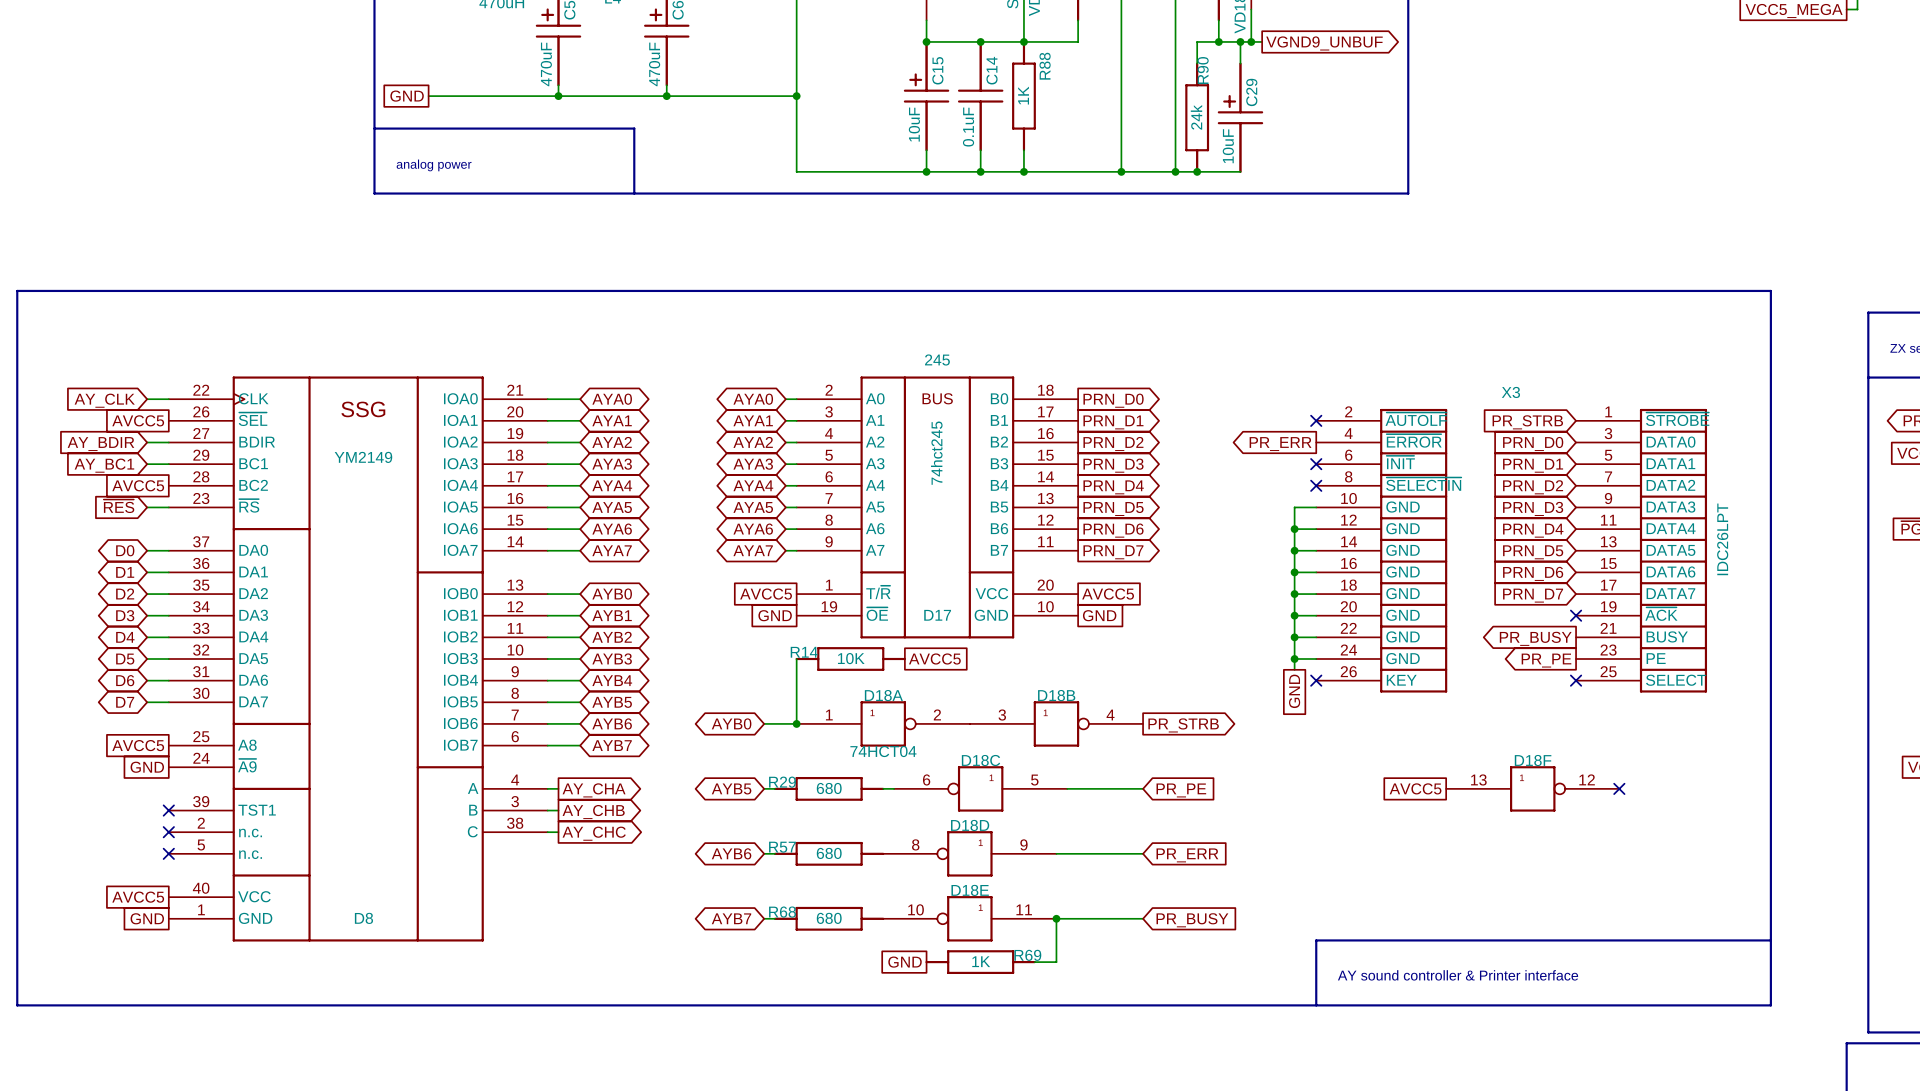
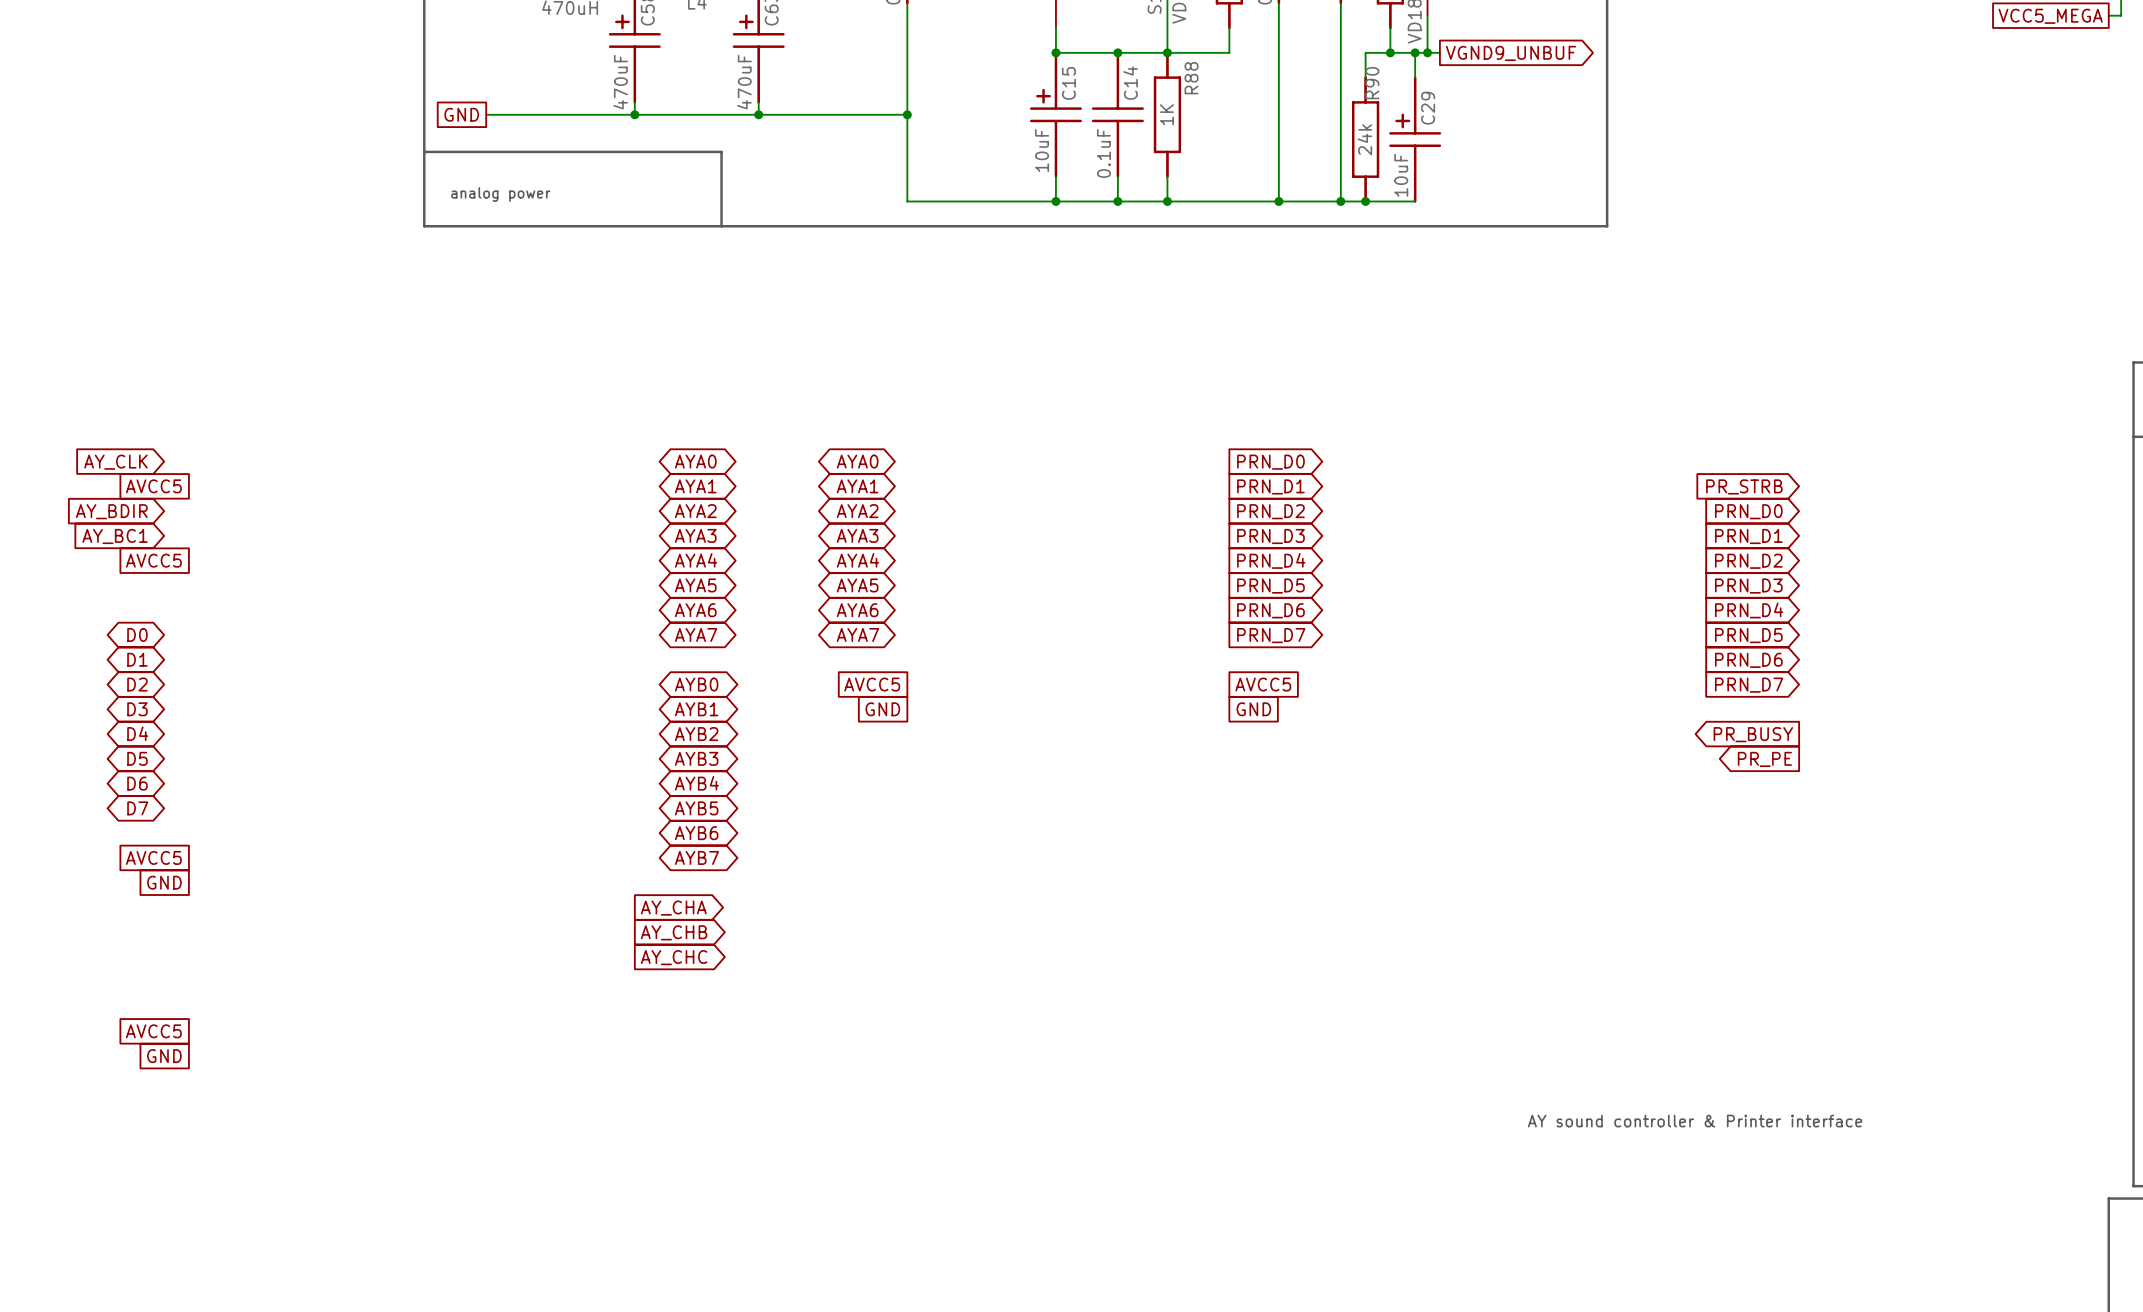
line: (17, 290) (1770, 290) (1770, 1005) (17, 1005) (17, 290) -> none
wire: (147, 399) (168, 399) -> none
wire: (547, 399) (580, 399) -> none
wire: (785, 399) (796, 399) -> none
wire: (547, 420) (580, 420) -> none
wire: (785, 420) (796, 420) -> none
no-connect mark: (1316, 420) -> none
wire: (147, 442) (168, 442) -> none
wire: (547, 442) (580, 442) -> none
wire: (785, 442) (796, 442) -> none
global label: PR_ERR (1280, 444) -> none
wire: (147, 464) (168, 464) -> none
wire: (547, 464) (580, 464) -> none
wire: (785, 464) (796, 464) -> none
no-connect mark: (1316, 464) -> none
wire: (547, 485) (580, 485) -> none
wire: (785, 485) (796, 485) -> none
no-connect mark: (1316, 485) -> none
global label: ~{RES} (118, 506) -> none
wire: (147, 507) (168, 507) -> none
wire: (547, 507) (580, 507) -> none
wire: (785, 507) (796, 507) -> none
D17: 245 (937, 507) -> none
wire: (1316, 507) (1294, 507) (1294, 669) -> none
wire: (547, 529) (580, 529) -> none
wire: (785, 529) (796, 529) -> none
wire: (1294, 529) (1316, 529) -> none
junction: (1294, 529) -> none
wire: (147, 550) (168, 550) -> none
wire: (547, 550) (580, 550) -> none
wire: (785, 550) (796, 550) -> none
wire: (1294, 550) (1316, 550) -> none
junction: (1294, 550) -> none
X3: IDC26LPT (1511, 550) -> none
wire: (147, 572) (168, 572) -> none
wire: (1294, 572) (1316, 572) -> none
junction: (1294, 572) -> none
wire: (147, 594) (168, 594) -> none
wire: (547, 594) (580, 594) -> none
wire: (1294, 594) (1316, 594) -> none
junction: (1294, 594) -> none
wire: (147, 615) (168, 615) -> none
wire: (547, 615) (580, 615) -> none
wire: (1294, 615) (1316, 615) -> none
junction: (1294, 615) -> none
no-connect mark: (1576, 615) -> none
wire: (147, 637) (168, 637) -> none
wire: (547, 637) (580, 637) -> none
wire: (1294, 637) (1316, 637) -> none
junction: (1294, 637) -> none
wire: (147, 658) (168, 658) -> none
D8: YM2149 (358, 658) -> none
wire: (547, 658) (580, 658) -> none
wire: (796, 658) (796, 723) (764, 723) -> none
R14: 10K (850, 658) -> none
global label: AVCC5 (934, 658) -> none
wire: (1294, 658) (1316, 658) -> none
junction: (1294, 658) -> none
wire: (147, 680) (168, 680) -> none
wire: (547, 680) (580, 680) -> none
no-connect mark: (1316, 680) -> none
no-connect mark: (1576, 680) -> none
global label: GND (1294, 691) -> none
wire: (147, 702) (168, 702) -> none
wire: (547, 702) (580, 702) -> none
wire: (547, 723) (580, 723) -> none
global label: AYB0 (731, 723) -> none
junction: (796, 723) -> none
D18A: (883, 723) -> none
D18B: (1056, 723) -> none
global label: PR_STRB (1183, 725) -> none
wire: (547, 745) (580, 745) -> none
wire: (547, 788) (558, 788) -> none
global label: AYB5 (731, 788) -> none
wire: (764, 788) (775, 788) -> none
R29: 680 (829, 788) -> none
wire: (883, 788) (894, 788) -> none
D18C: (980, 788) -> none
wire: (1067, 788) (1143, 788) -> none
global label: AVCC5 (1415, 788) -> none
D18F: (1532, 788) -> none
no-connect mark: (1619, 788) -> none
global label: PR_PE (1181, 790) -> none
no-connect mark: (168, 810) -> none
wire: (547, 810) (558, 810) -> none
no-connect mark: (168, 832) -> none
wire: (547, 832) (558, 832) -> none
no-connect mark: (168, 853) -> none
global label: AYB6 (731, 853) -> none
wire: (764, 853) (775, 853) -> none
R57: 680 (829, 853) -> none
D18D: (969, 853) -> none
wire: (1056, 853) (1143, 853) -> none
global label: PR_ERR (1187, 855) -> none
global label: AYB7 (731, 918) -> none
wire: (764, 918) (775, 918) -> none
R68: 680 (829, 918) -> none
D18E: (969, 918) -> none
junction: (1056, 918) -> none
wire: (1143, 918) (1056, 918) (1056, 962) (1034, 962) -> none
global label: PR_BUSY (1192, 920) -> none
line: (1770, 940) (1316, 940) (1316, 1005) -> none
global label: GND (905, 962) -> none
R69: 1K (980, 962) -> none

